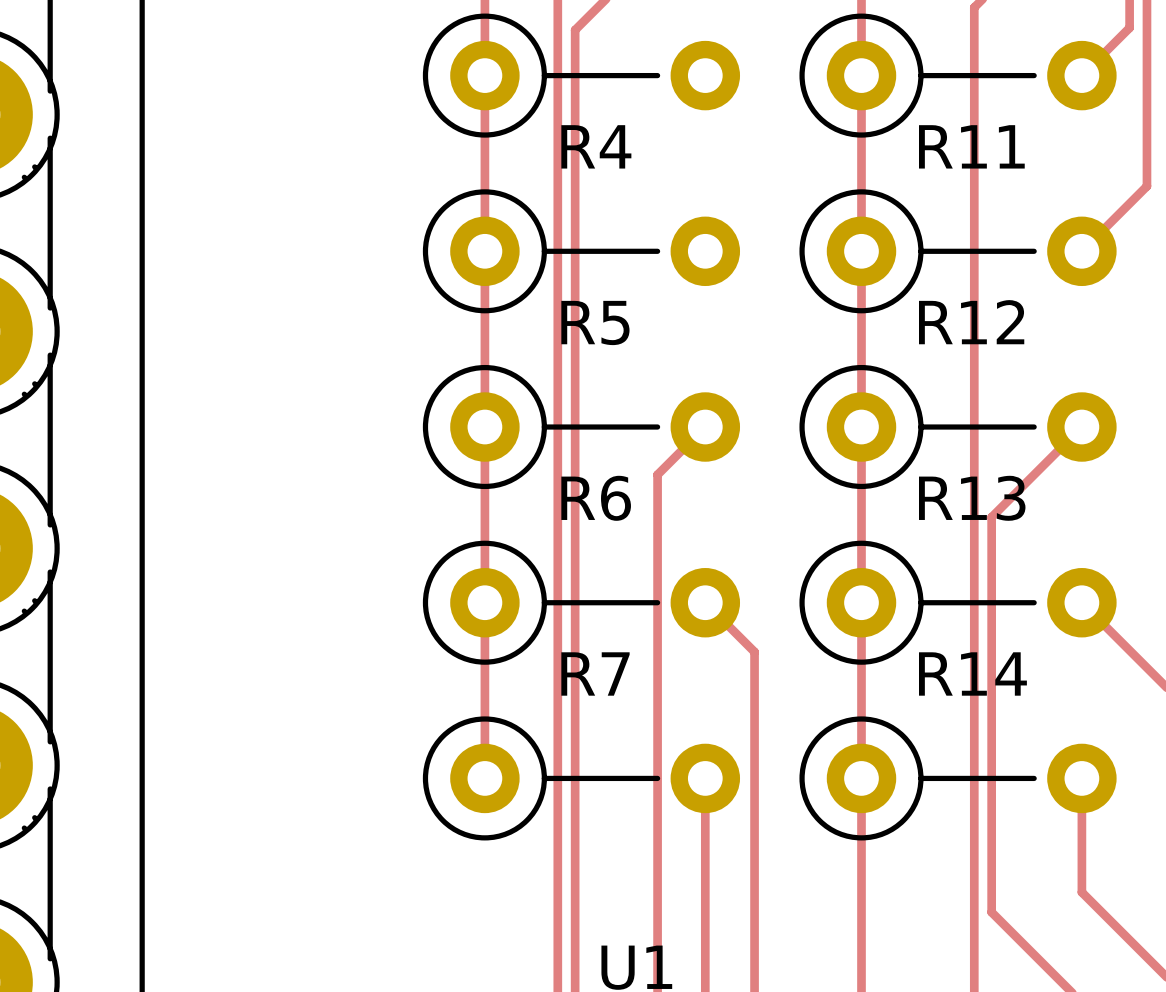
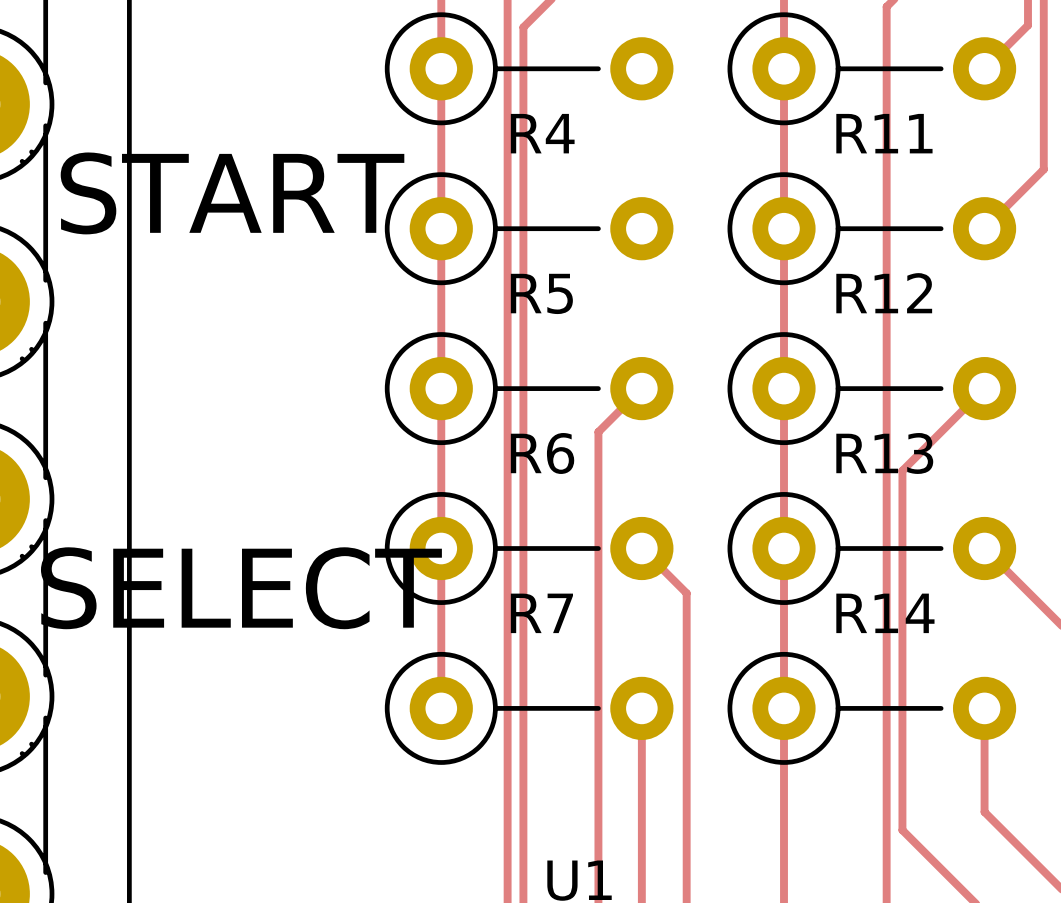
text: none -> START (232, 193)
text: none -> SELECT (241, 588)

